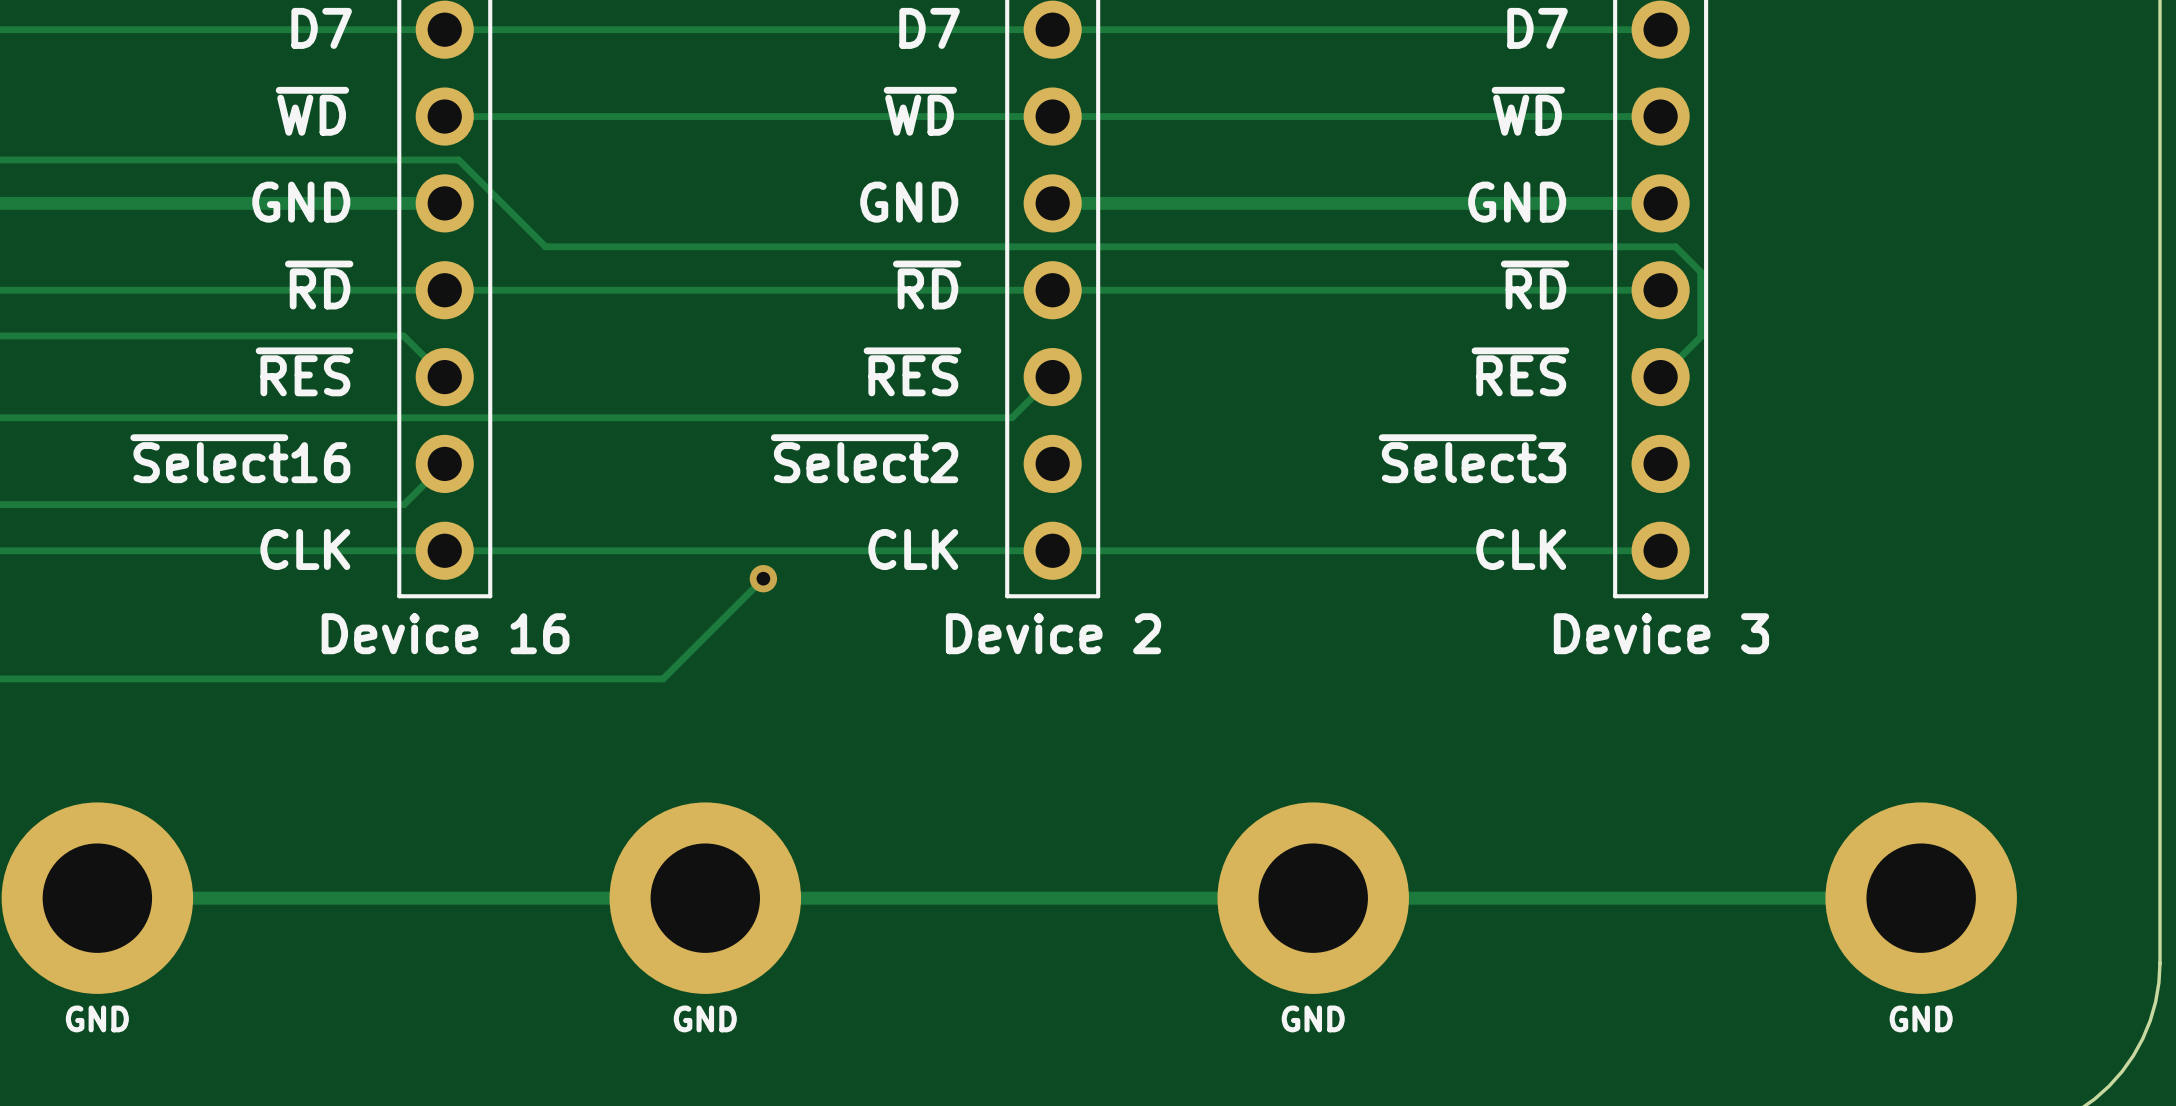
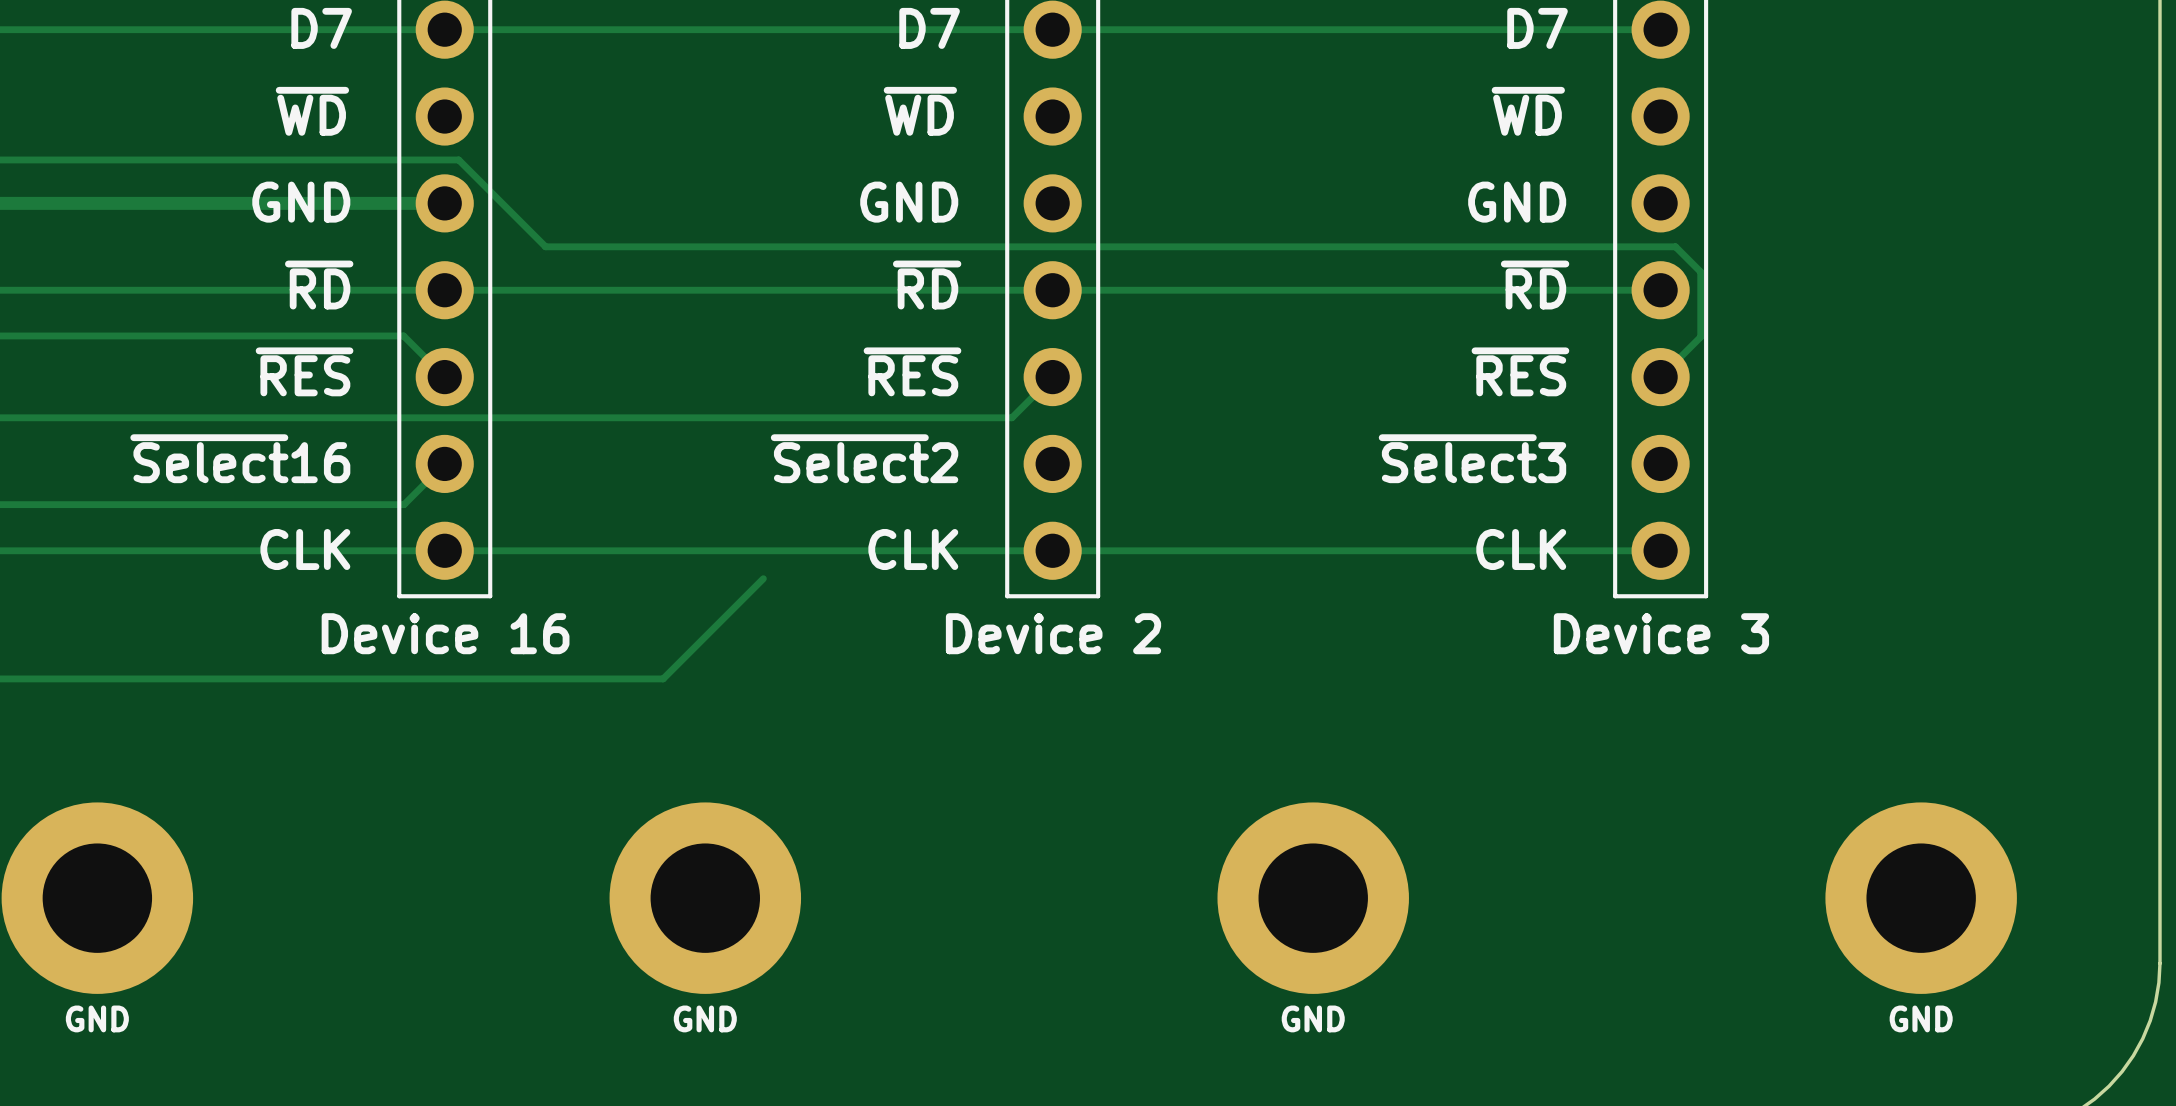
track: (444, 116) (1660, 116) -> none
track: (1052, 203) (1660, 203) -> none
via: (763, 578) -> none
track: (97, 898) (1921, 898) -> none

